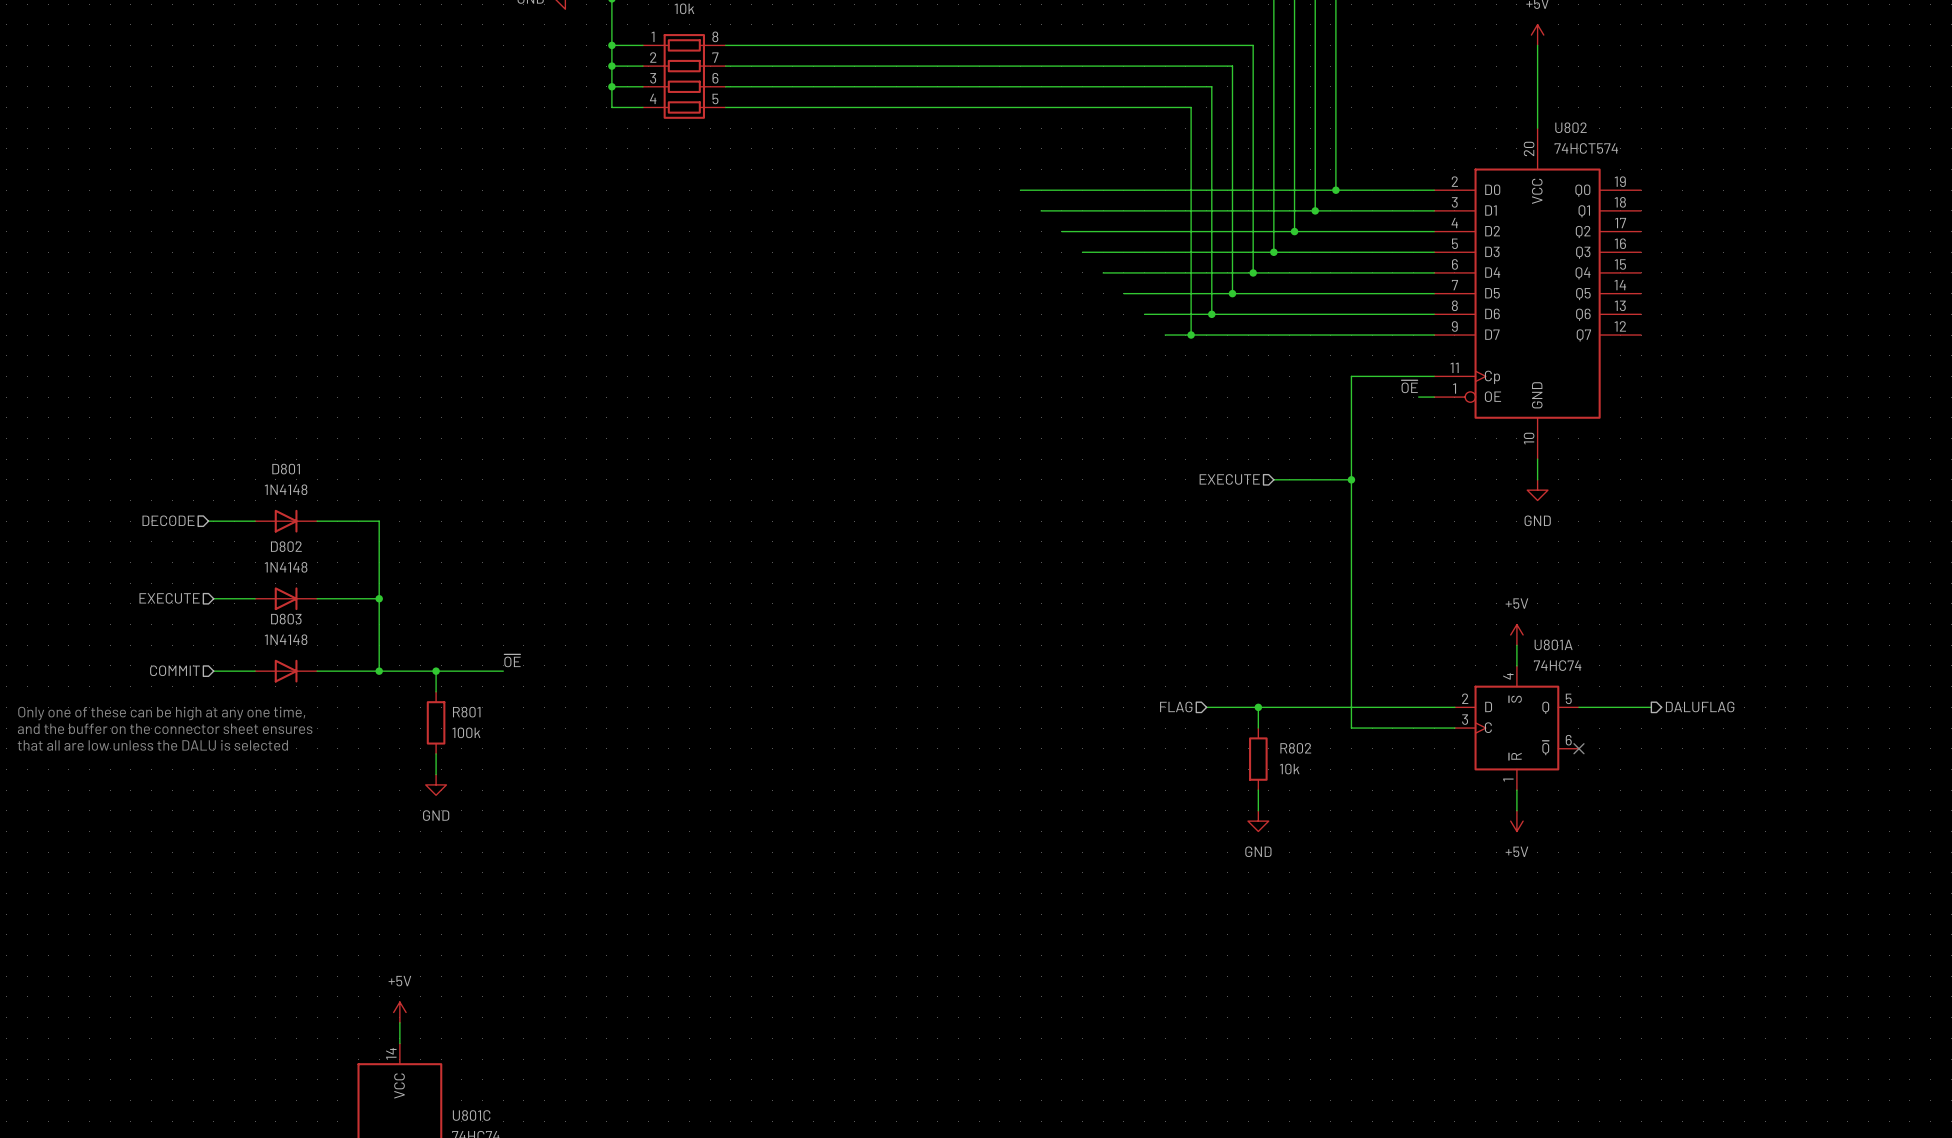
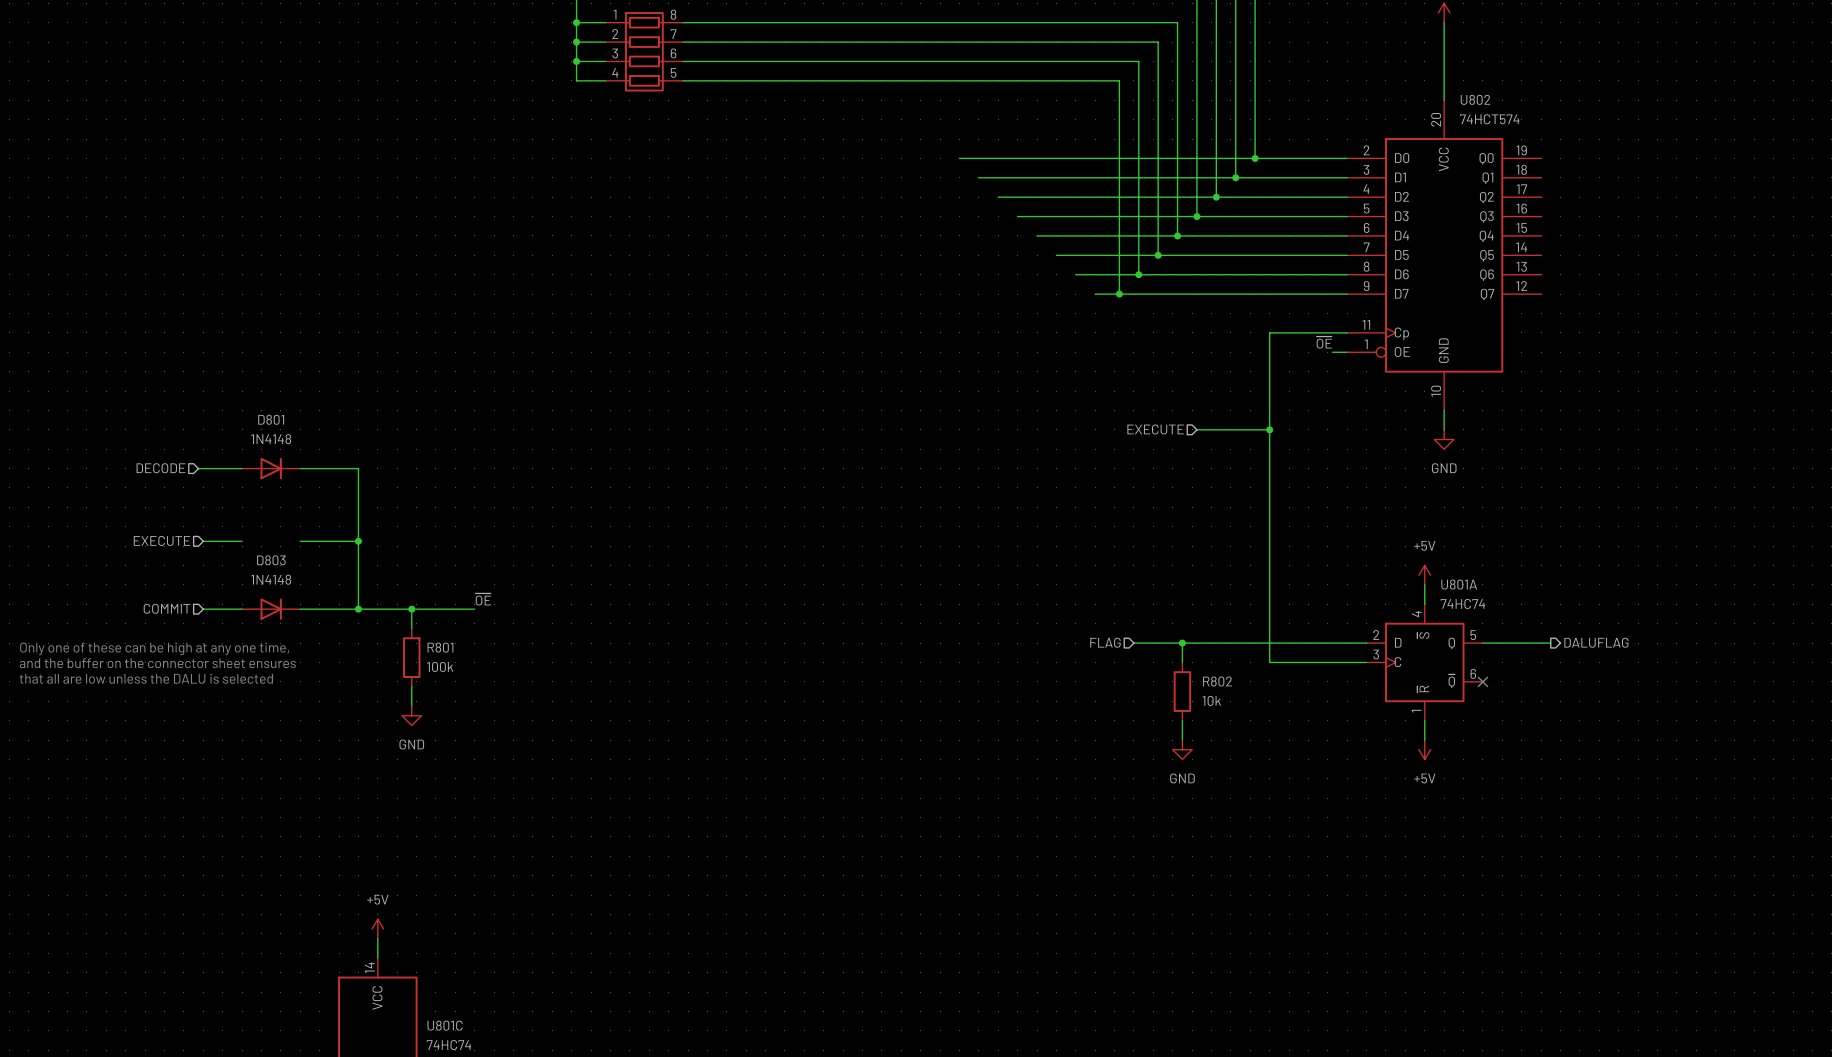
D802: 1N4148 (286, 598) -> none

